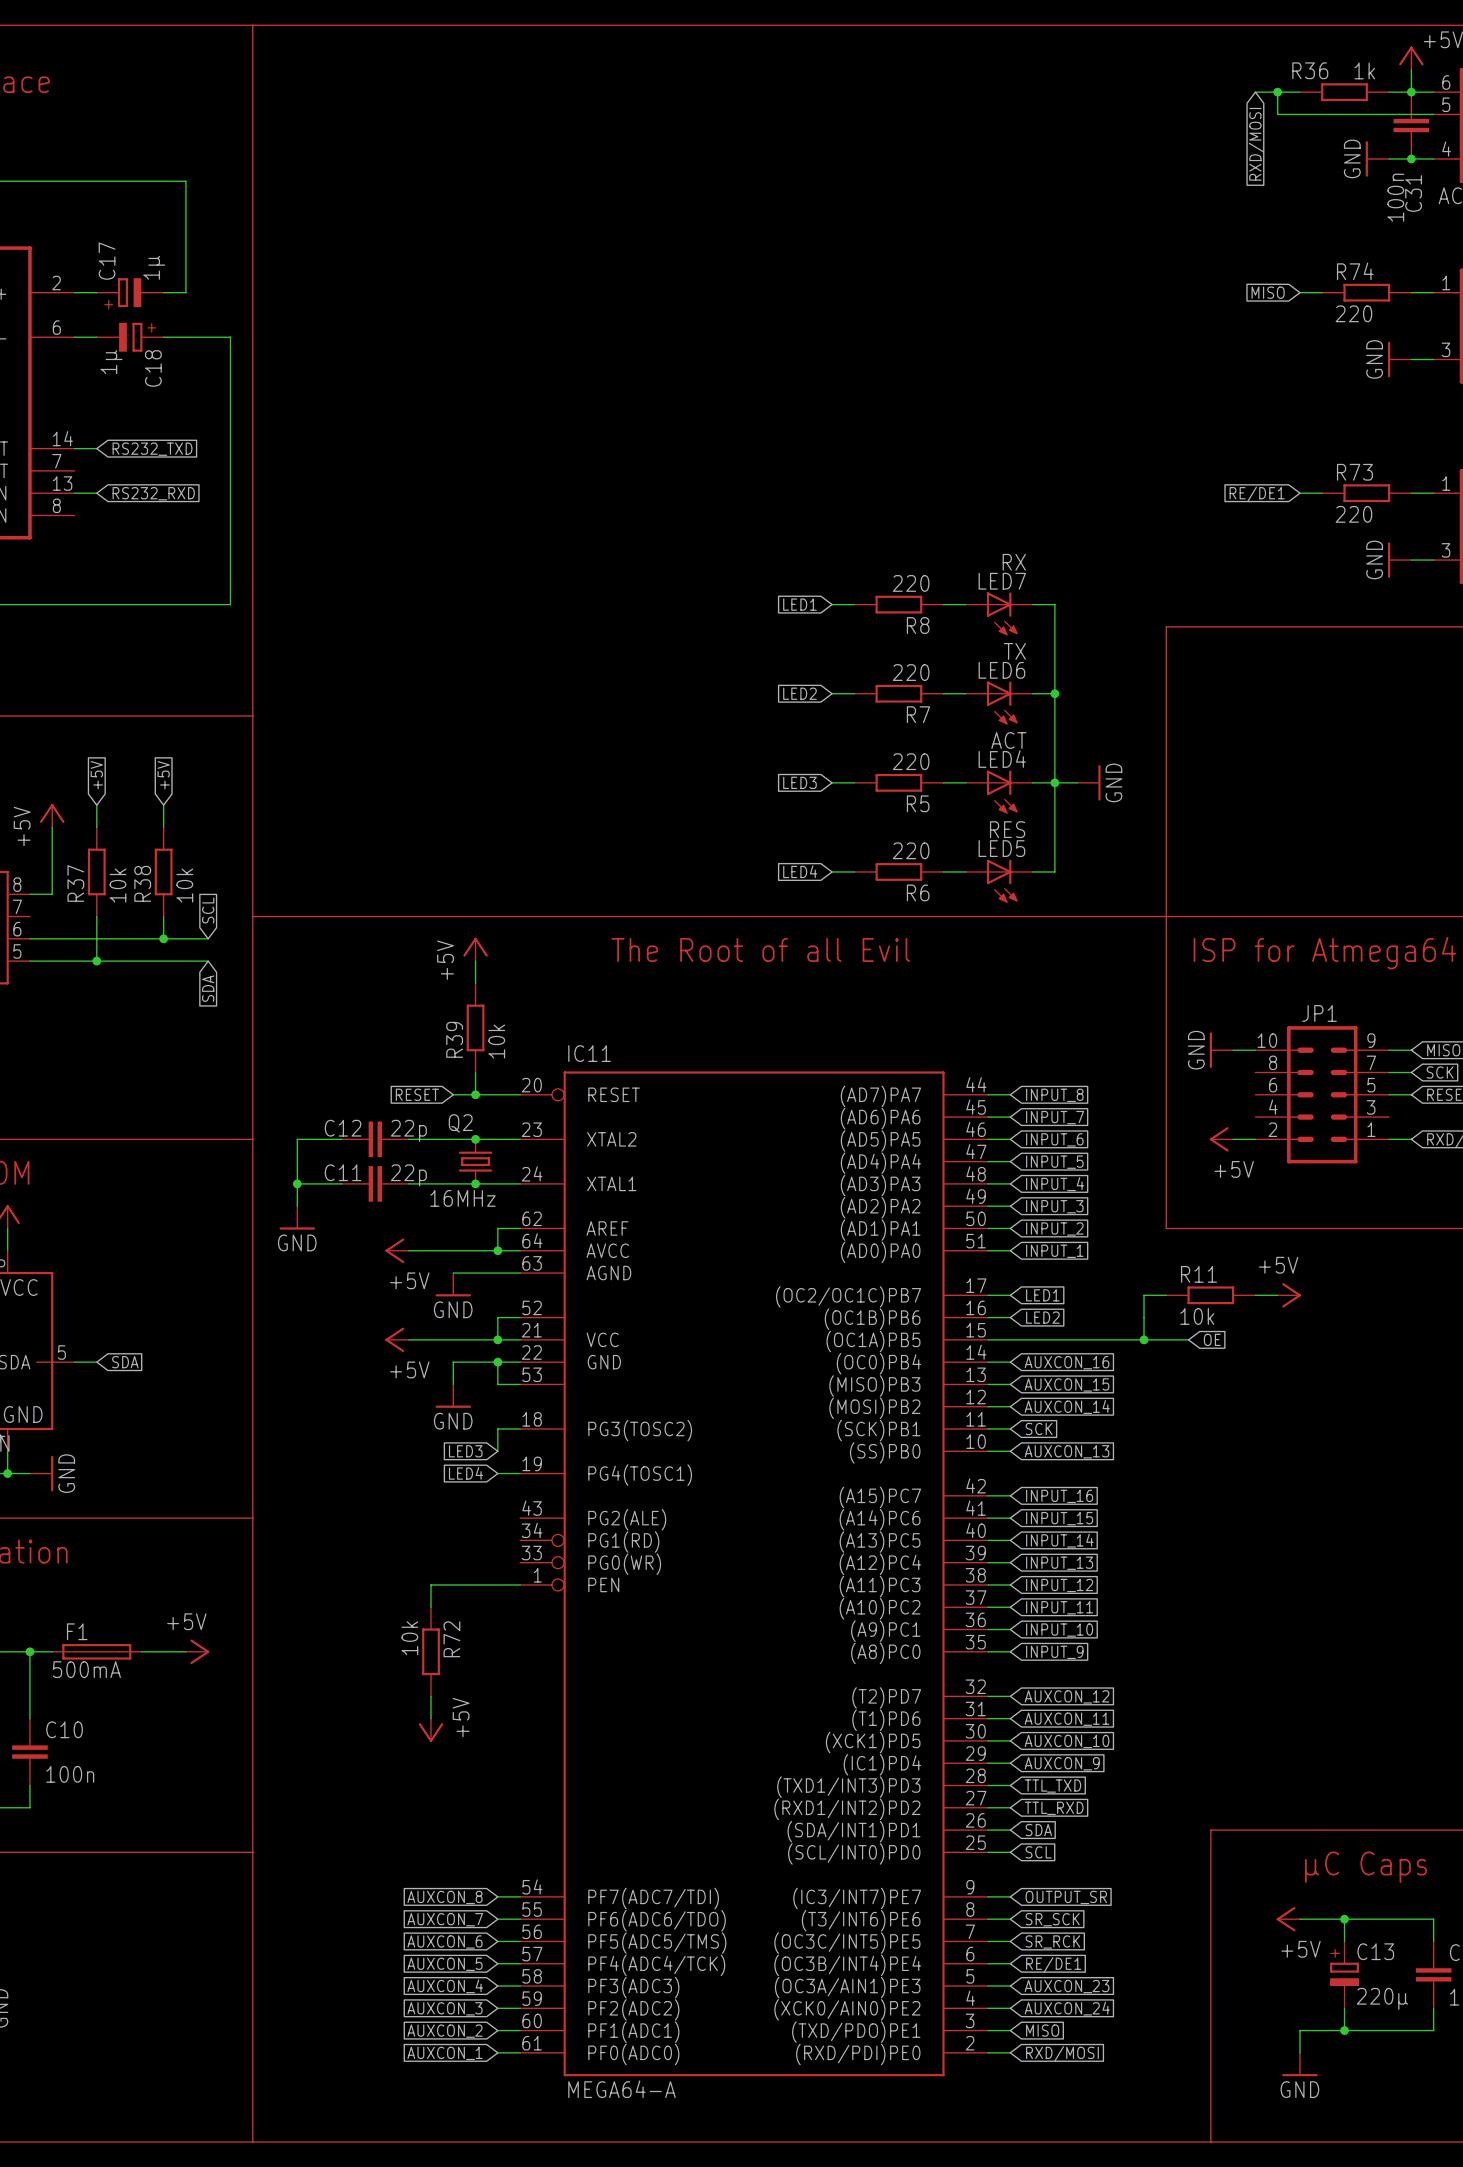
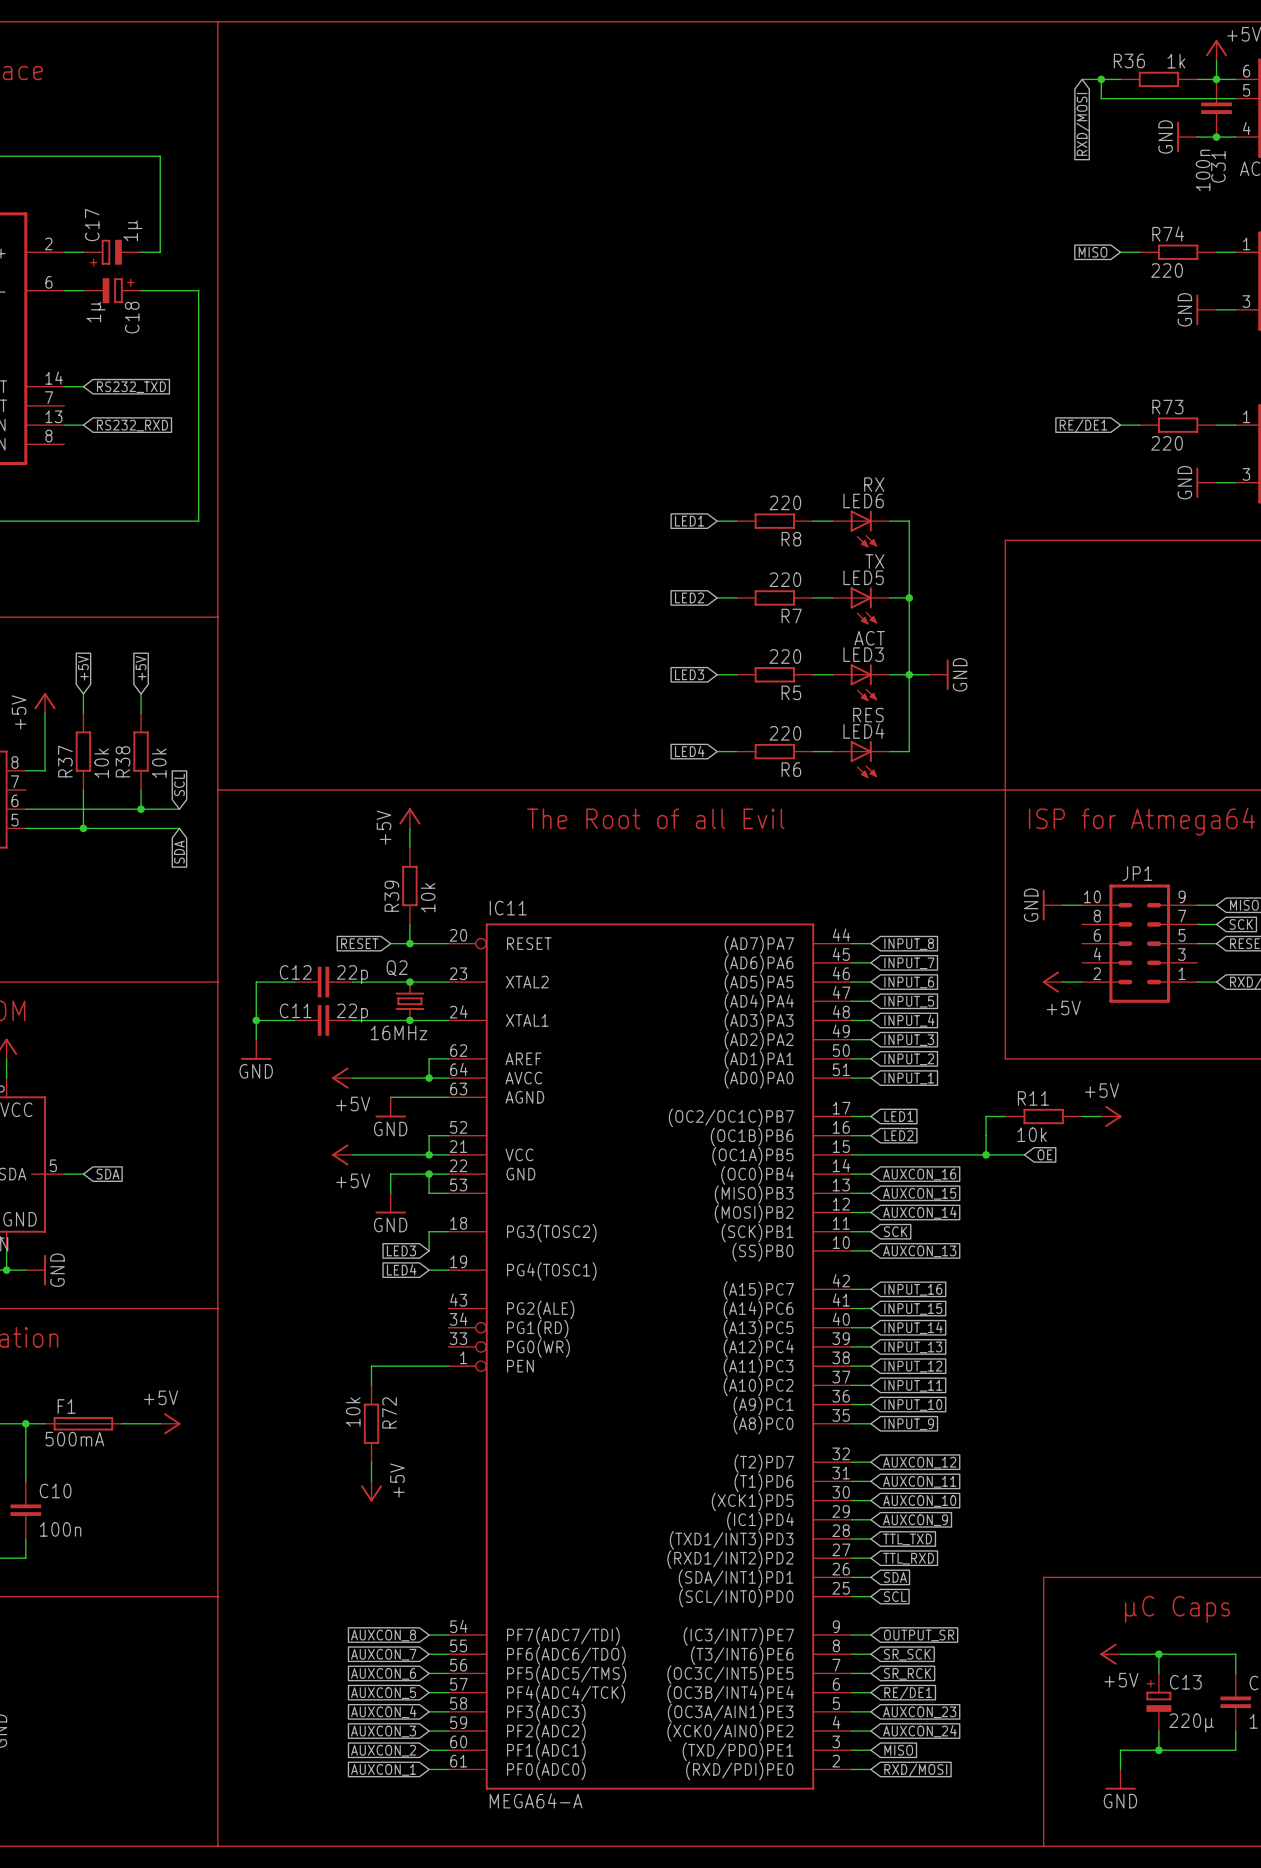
LED7 name: LED7 (1002, 581) -> LED6 (863, 500)
LED6 name: LED6 (1001, 670) -> LED5 (863, 577)
LED4 name: LED4 (1002, 759) -> LED3 (863, 654)
LED5 name: LED5 (1001, 848) -> LED4 (863, 731)

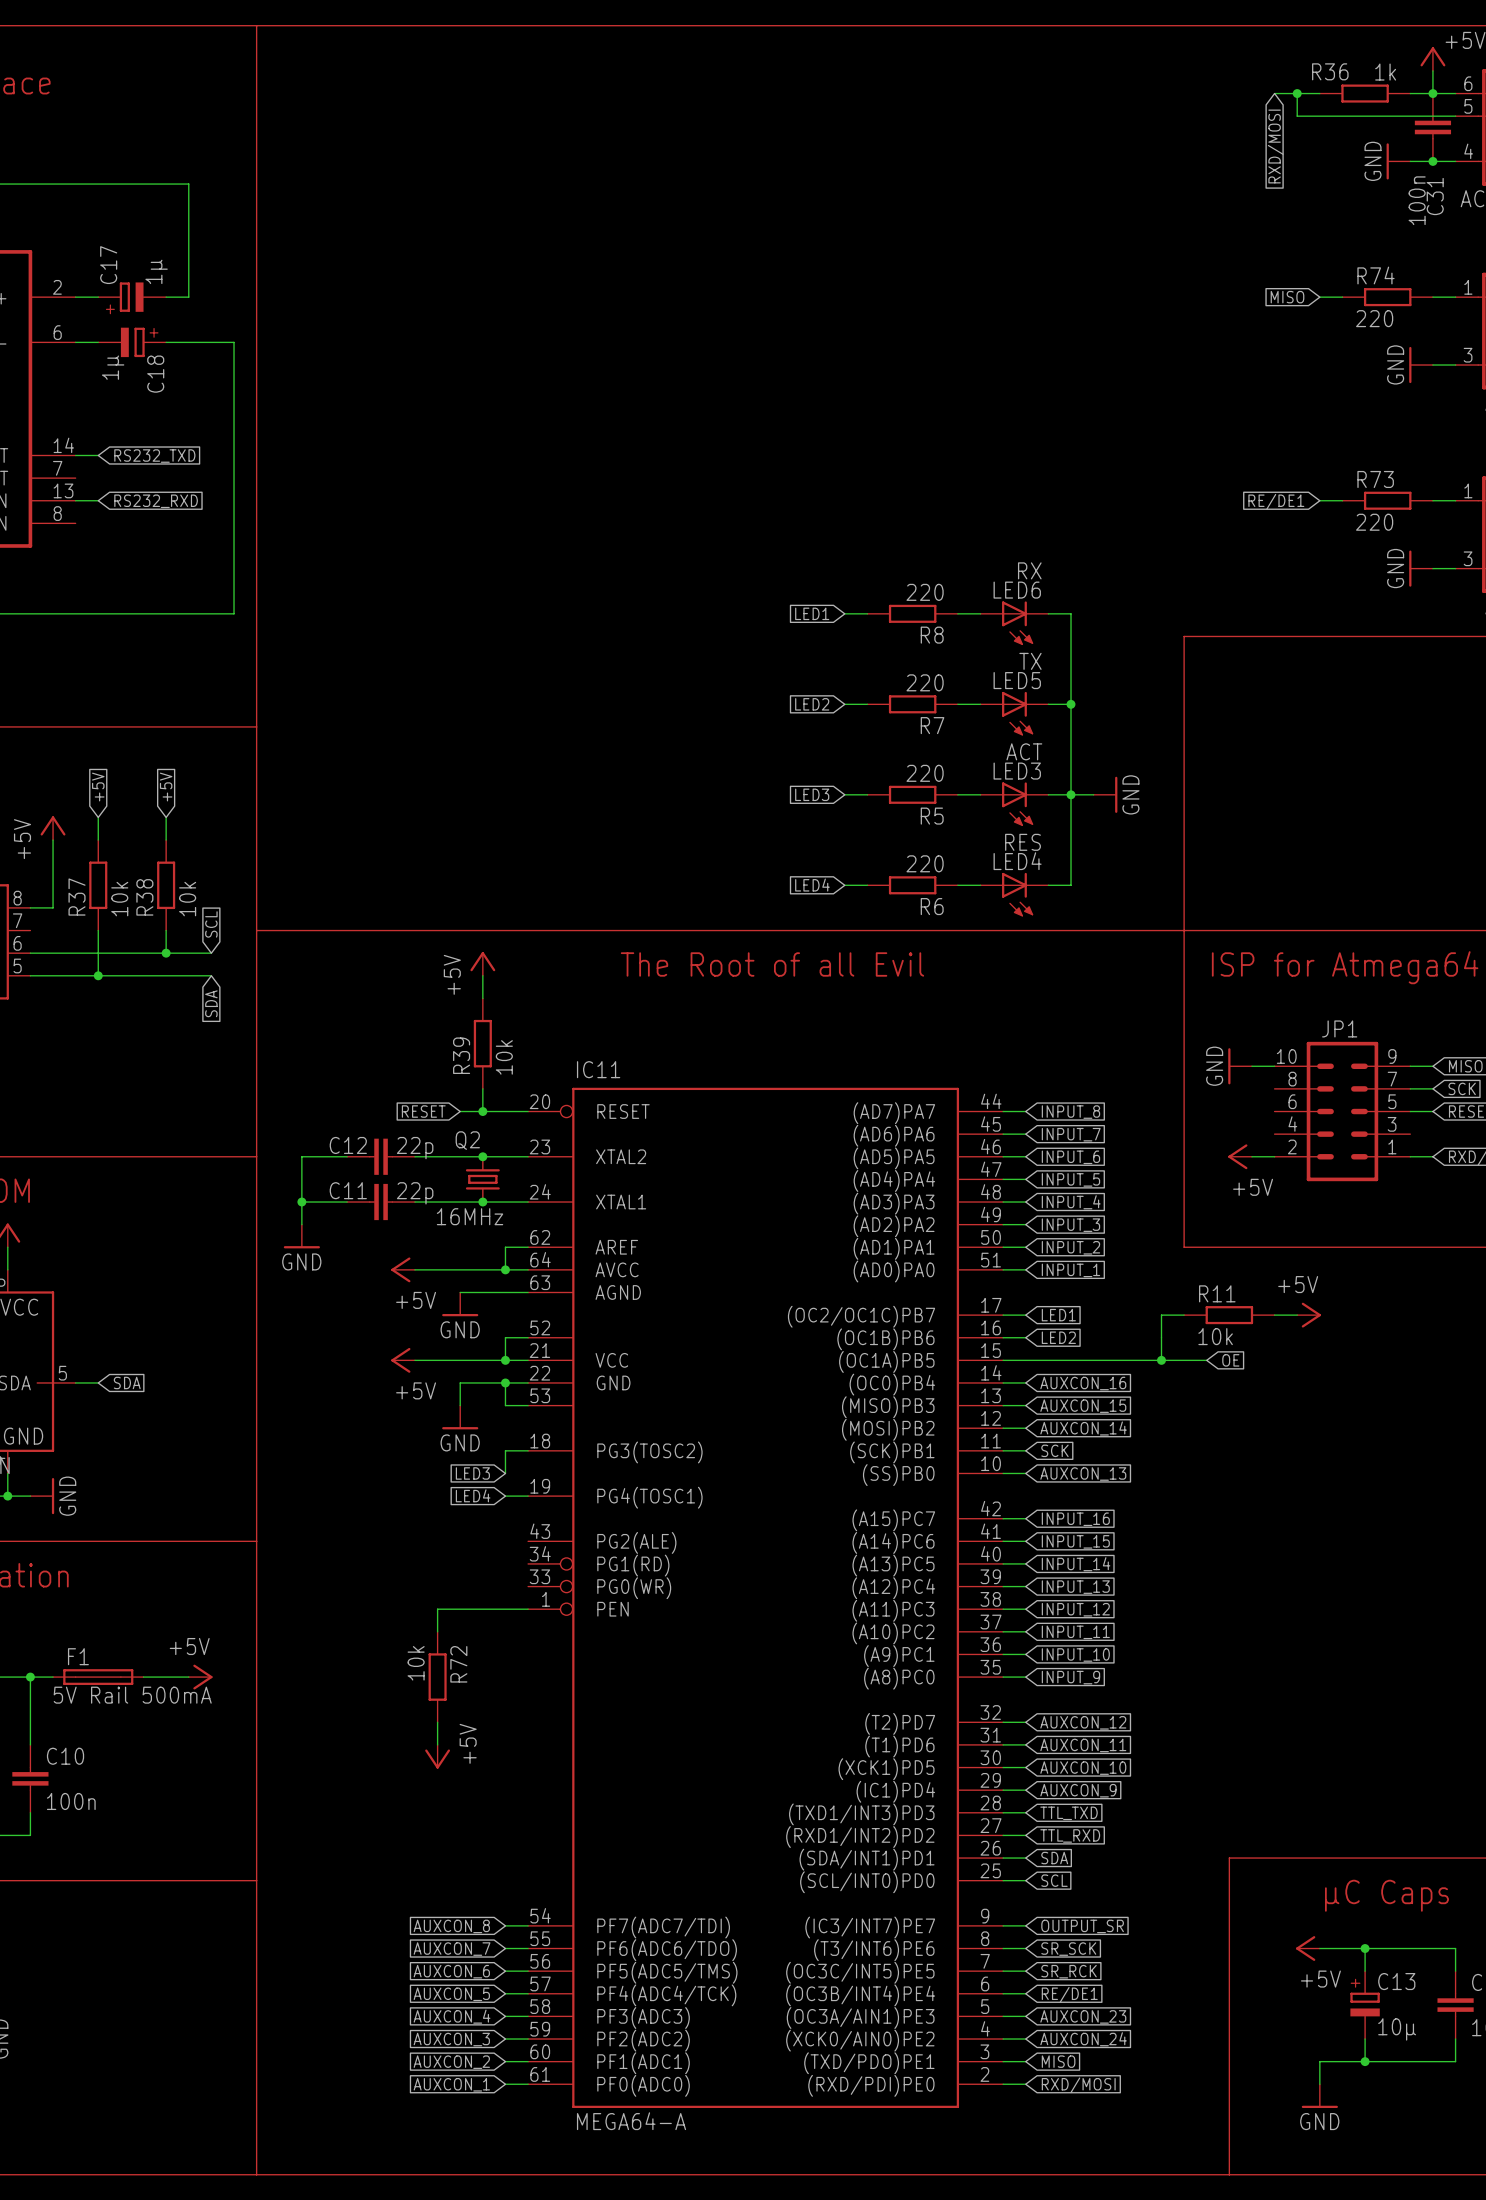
F1 value: 500mA (74, 1439) -> 5V Rail 500mA (132, 1695)
C13 value: 220µ (1191, 1722) -> 10µ (1397, 2029)

